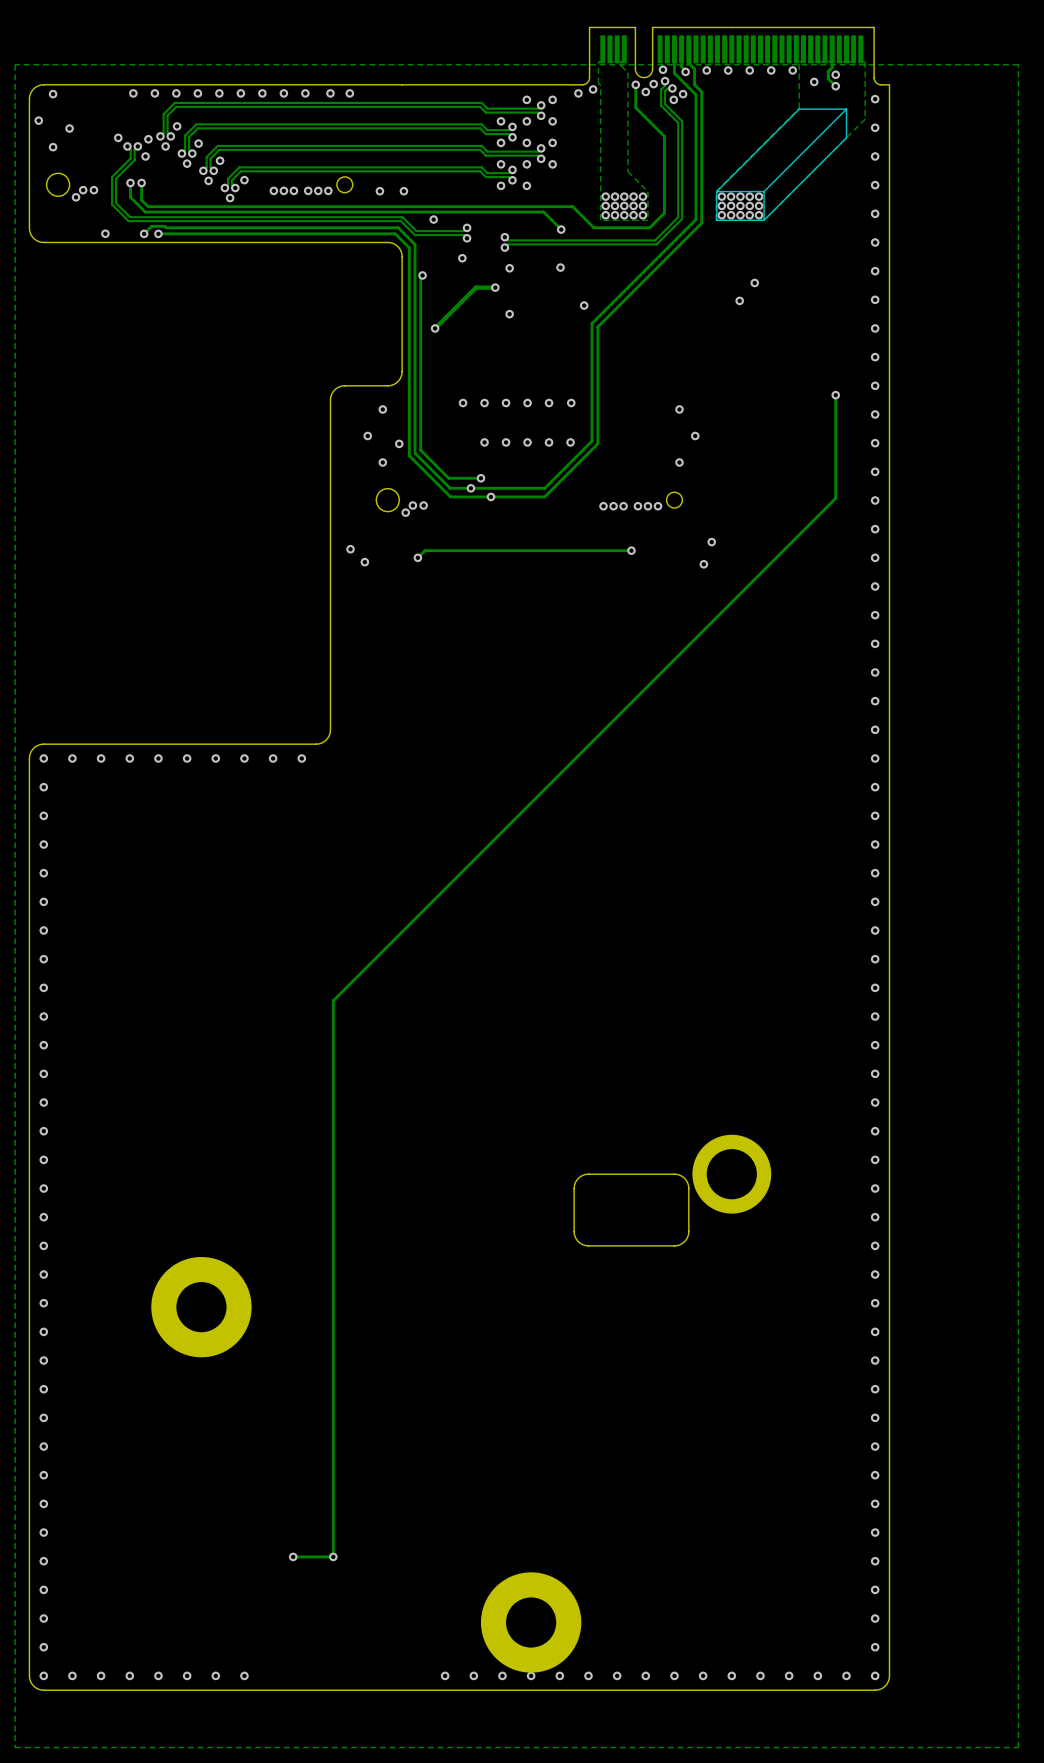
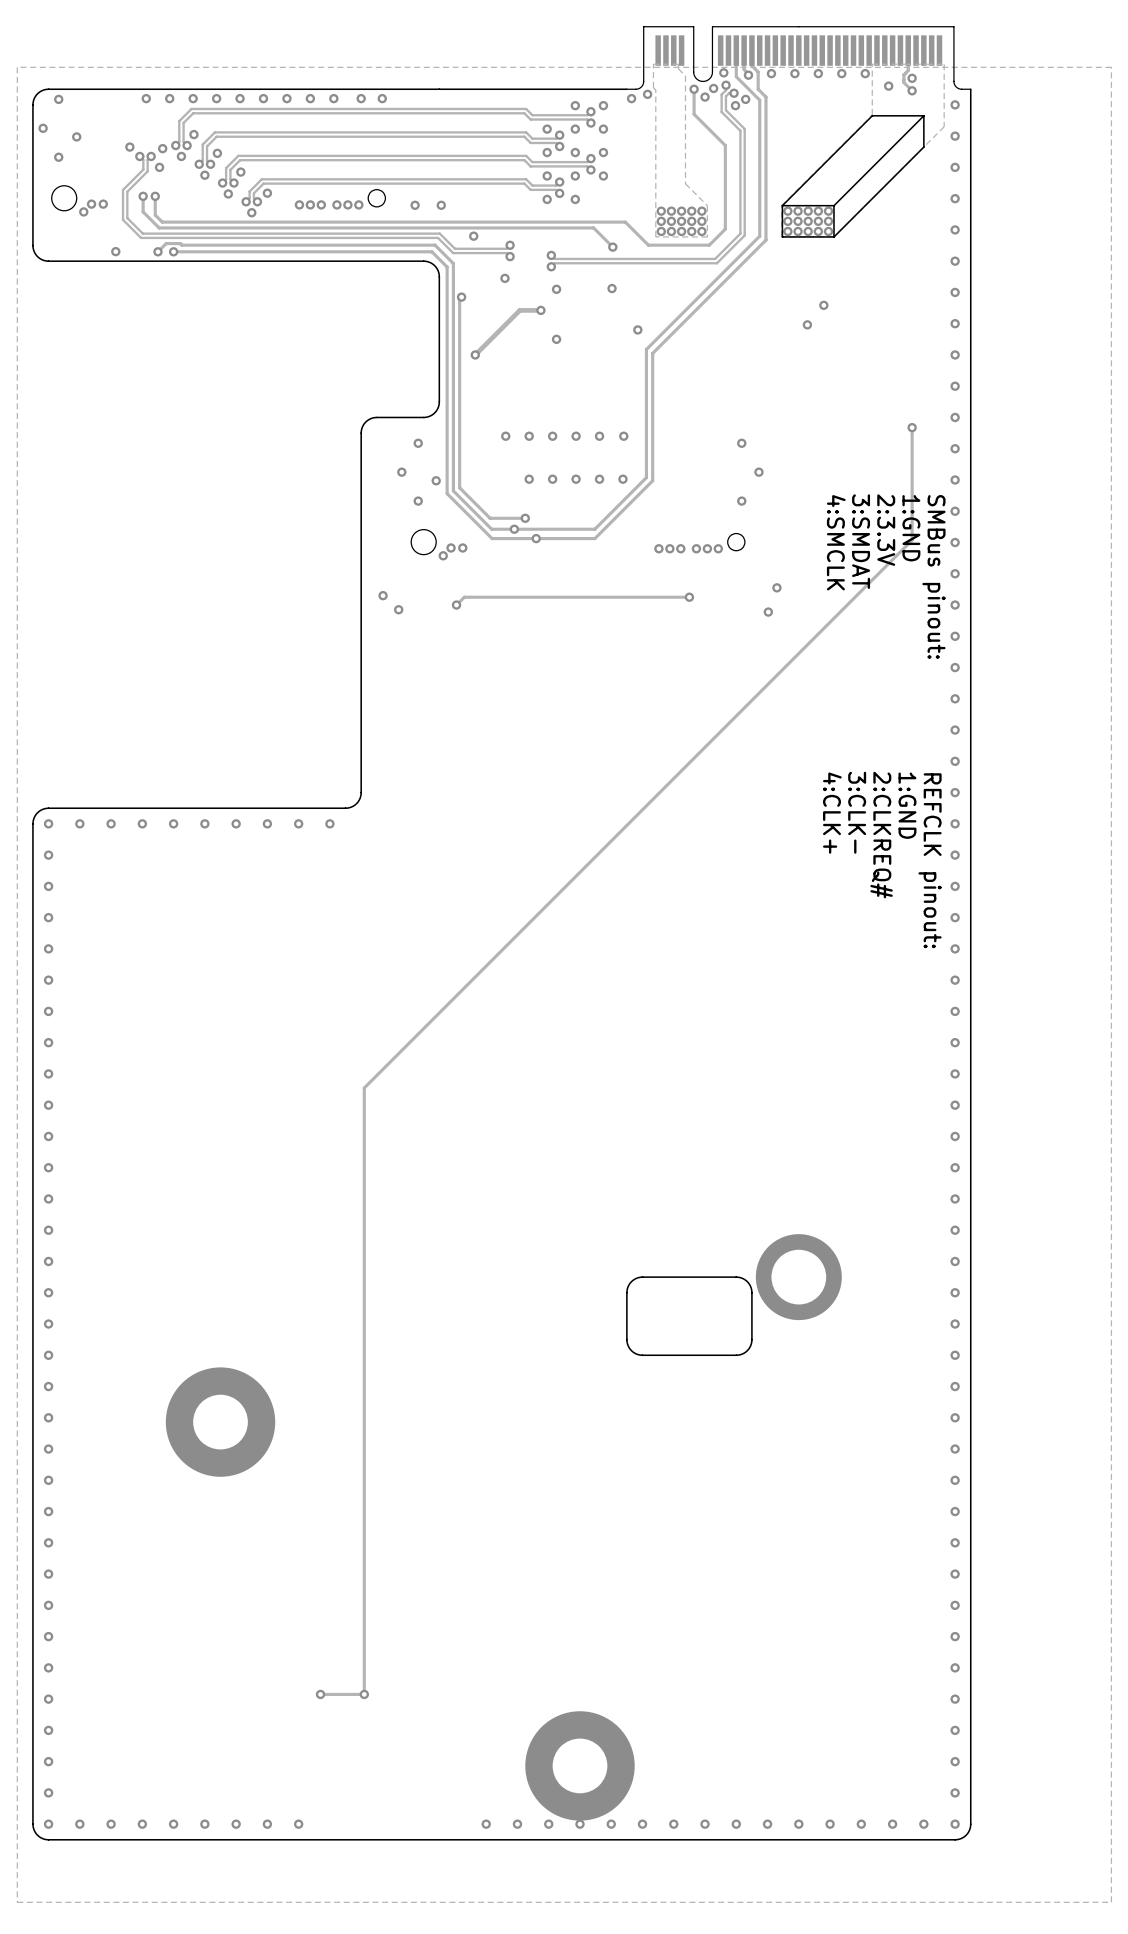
text: none -> 1:GND (911, 528)
text: none -> 2:3.3V (886, 530)
text: none -> 4:SMCLK (836, 542)
text: none -> 3:SMDAT (861, 541)
text: none -> SMBus pinout: (933, 576)
text: none -> 1:GND (907, 805)
text: none -> 3:CLK- (857, 812)
text: none -> 4:CLK+ (832, 813)
text: none -> 2:CLKREQ# (881, 835)
text: none -> REFCLK pinout: (930, 860)
via: none -> (298, 1824)

